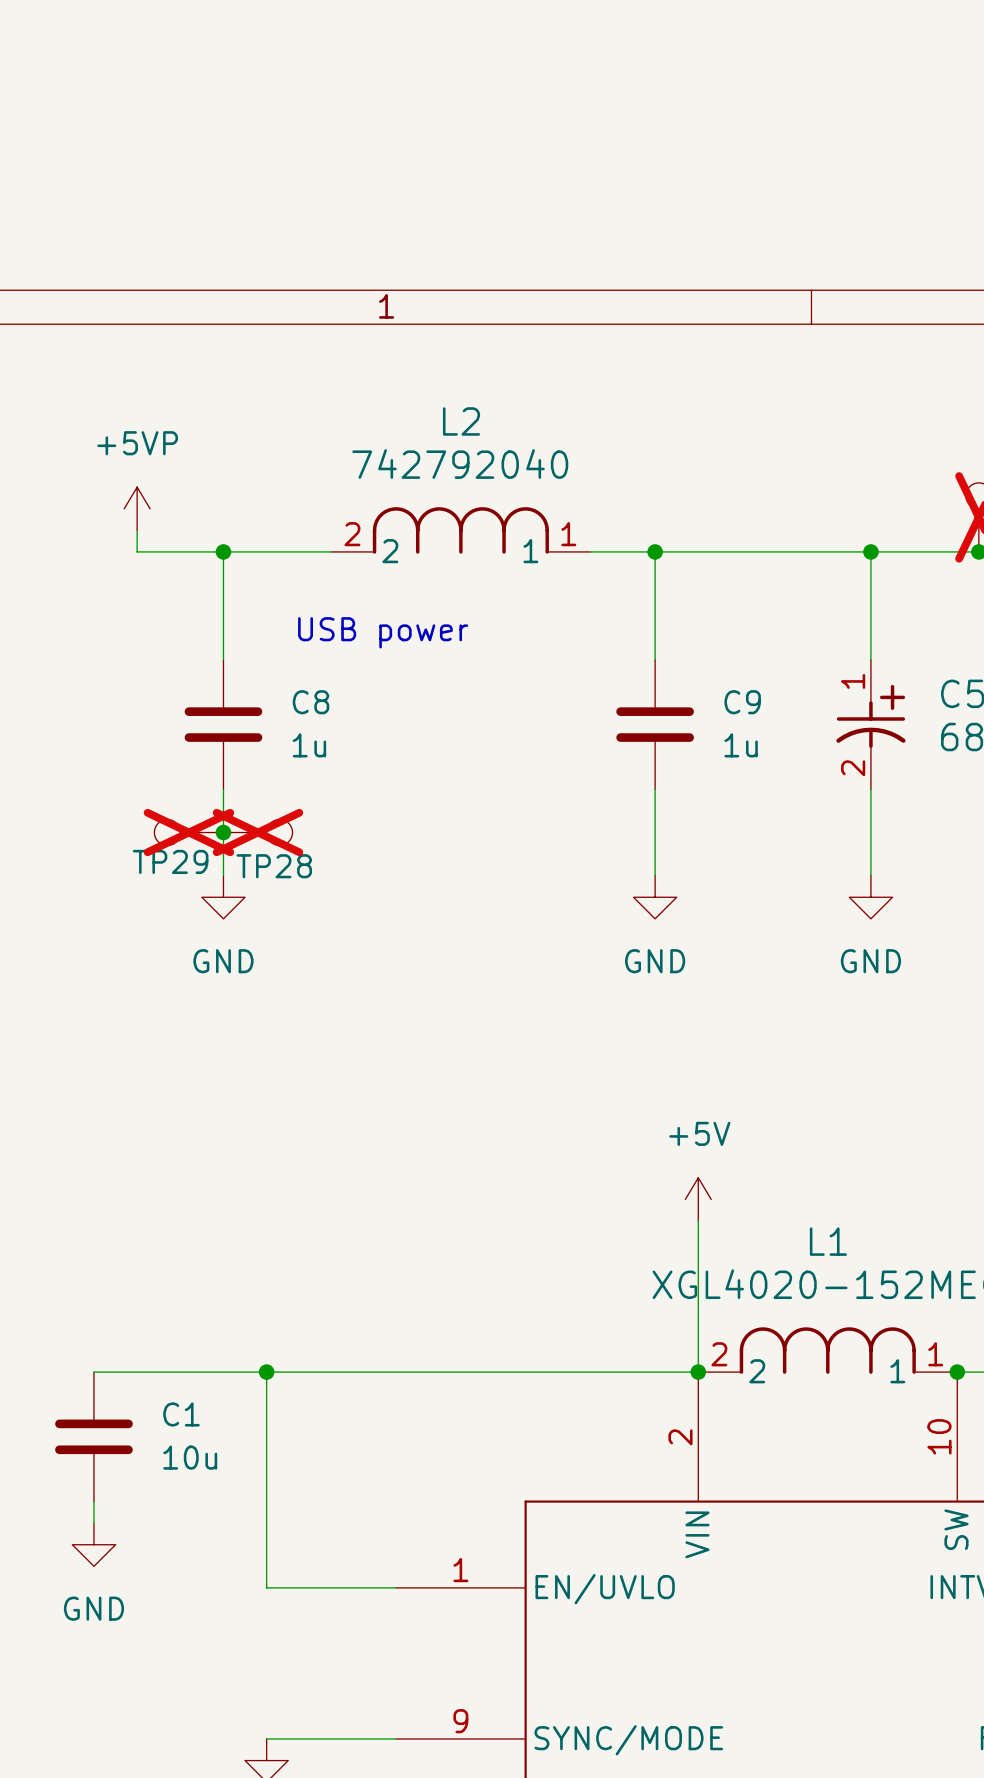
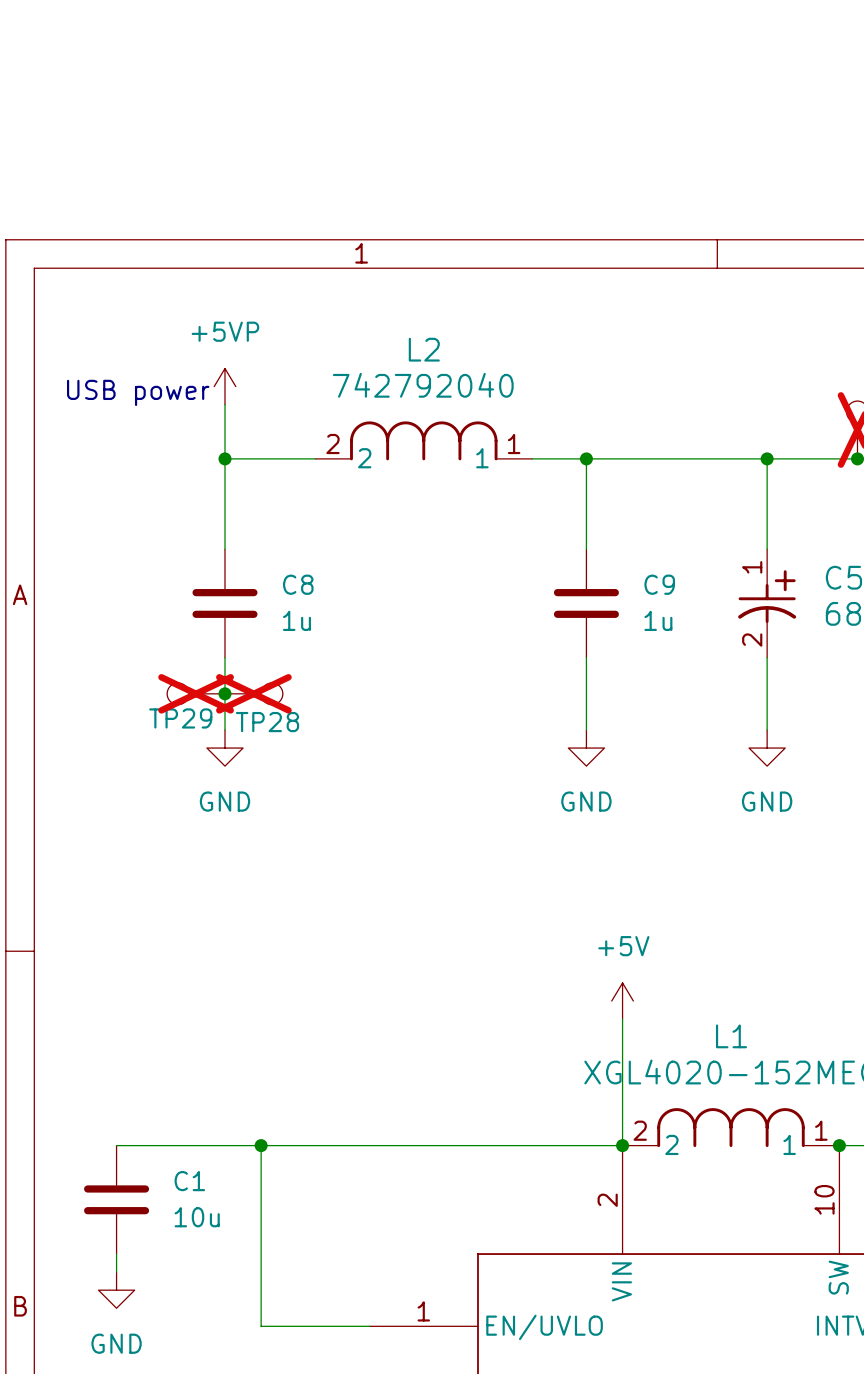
power symbol position: +5VP (137, 508) -> +5VP (224, 386)
wire: (137, 530) (137, 551) (223, 551) -> (224, 404) (224, 458)
text position: USB power (383, 632) -> USB power (138, 392)

